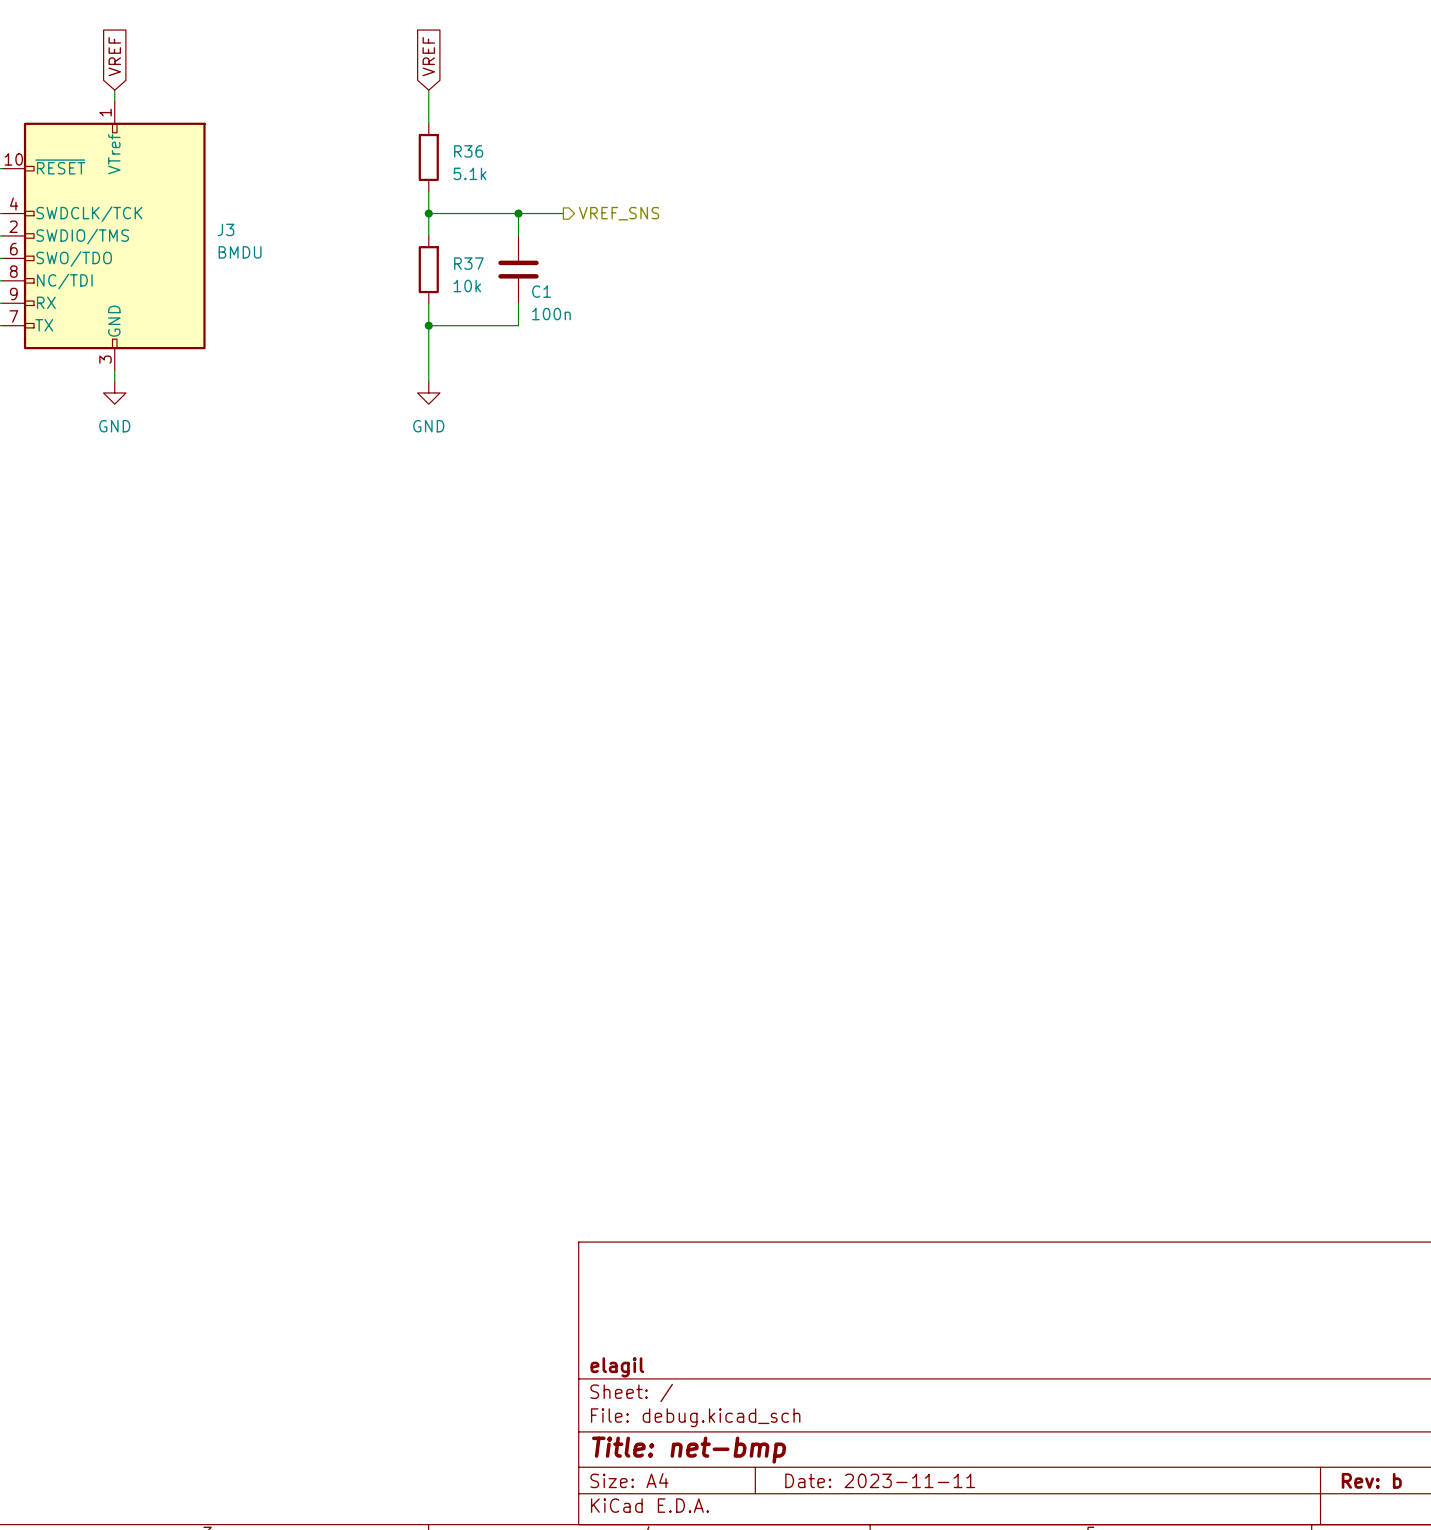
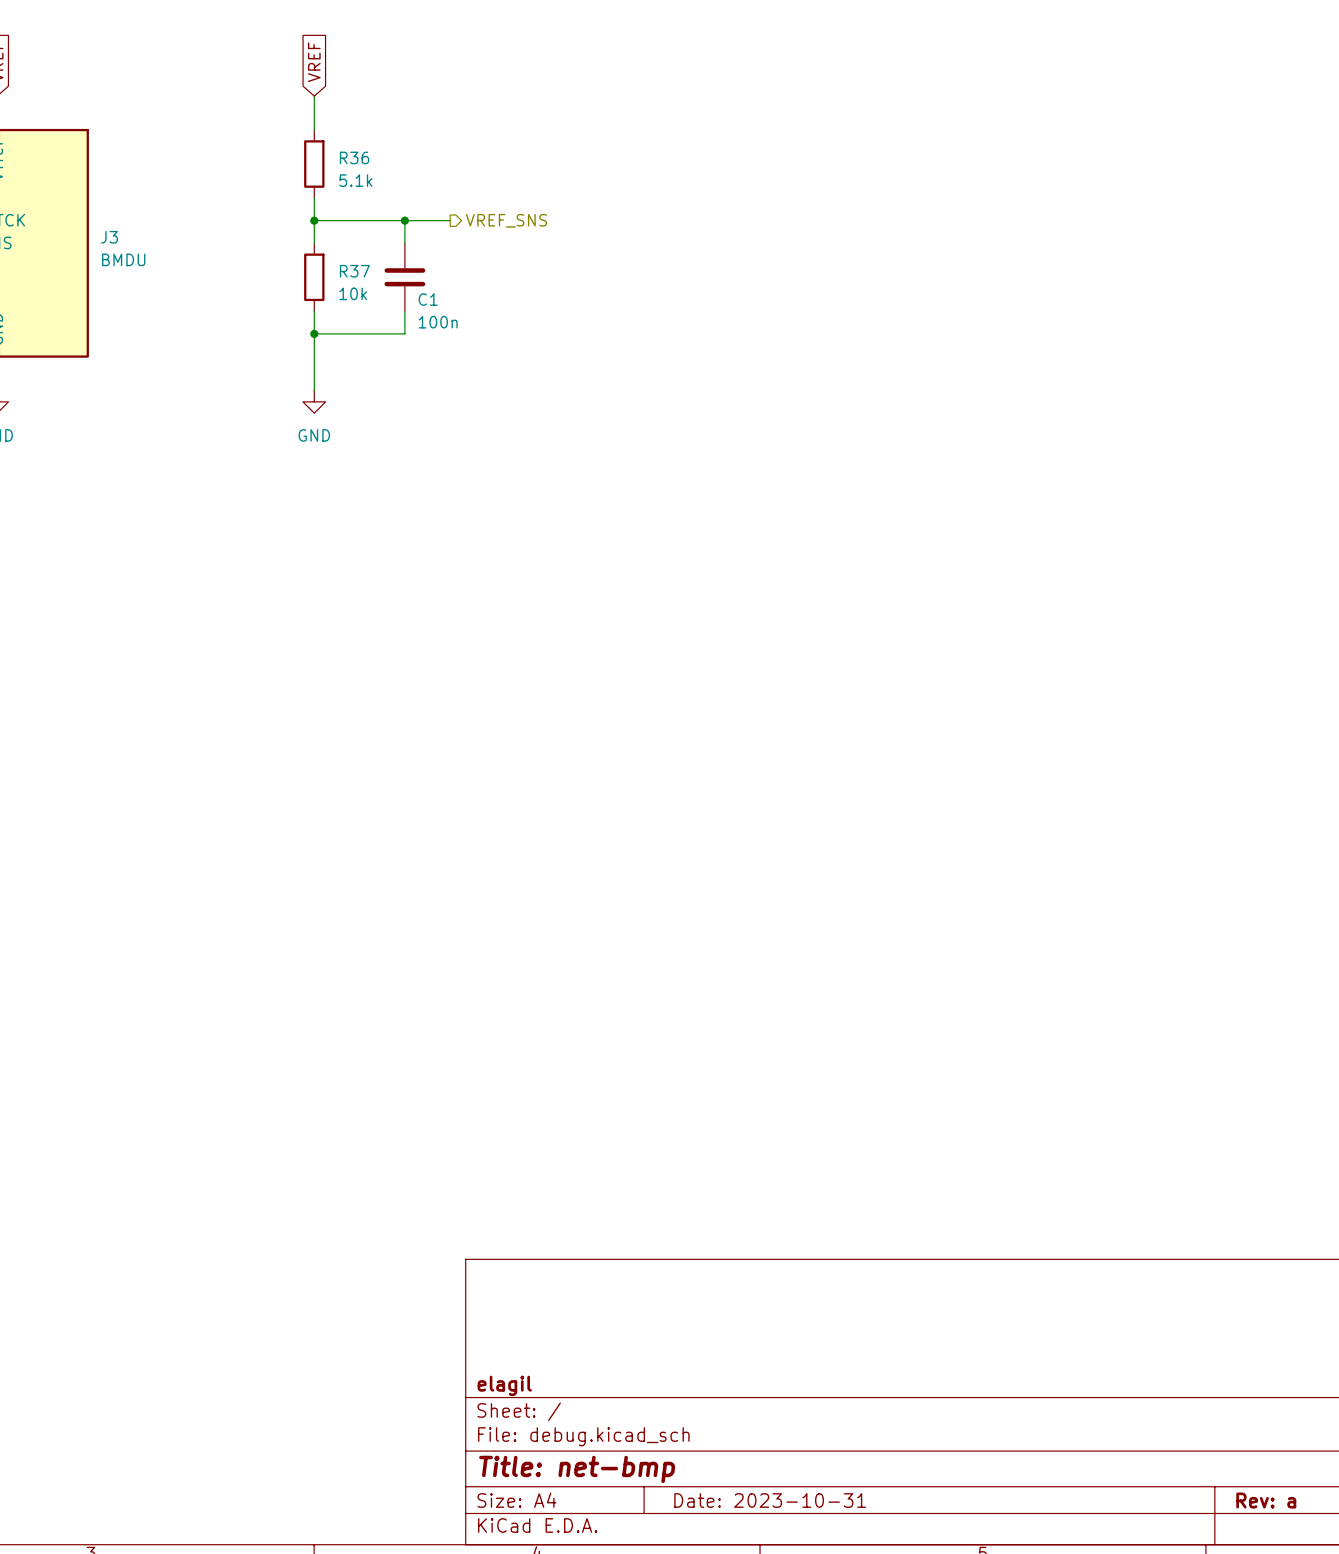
title block: Date: 2023-11-11 (880, 1480) -> Date: 2023-10-31 (770, 1500)
title block: Rev: b (1371, 1480) -> Rev: a (1266, 1500)

